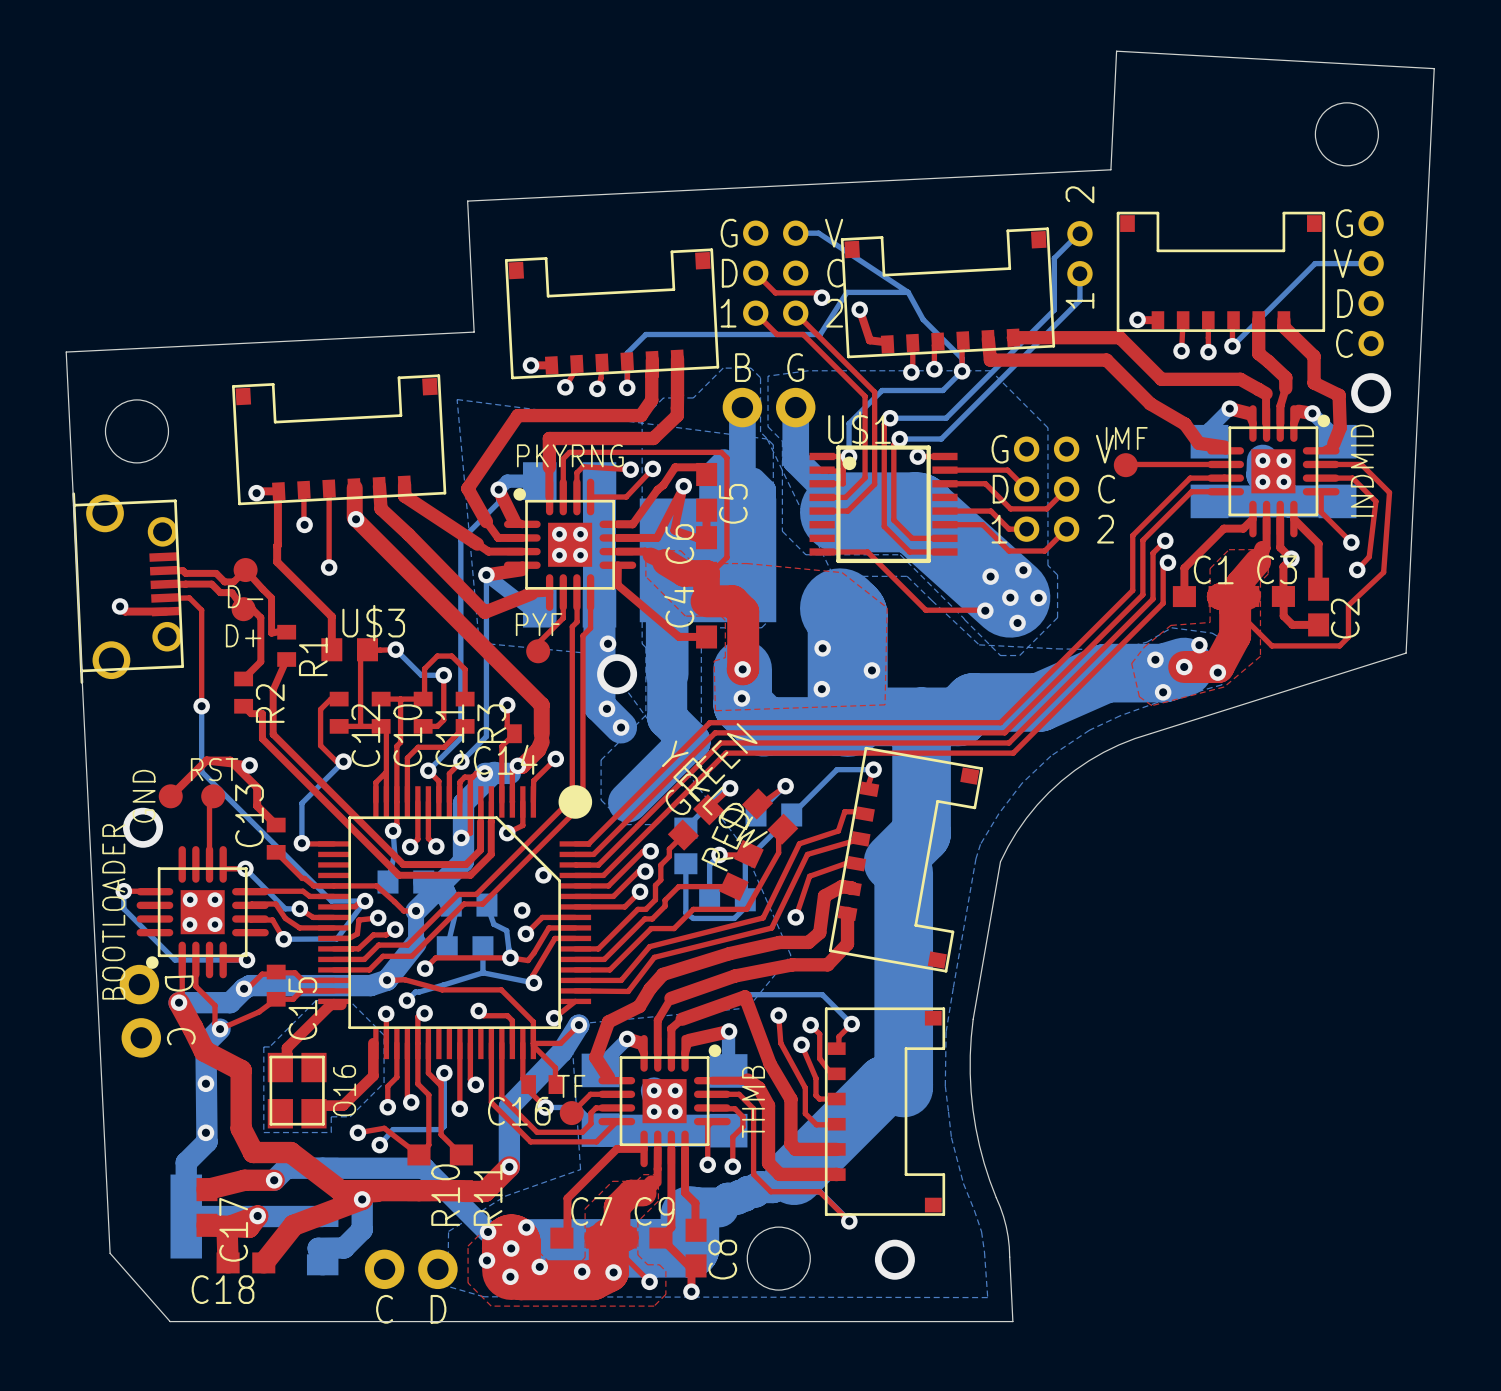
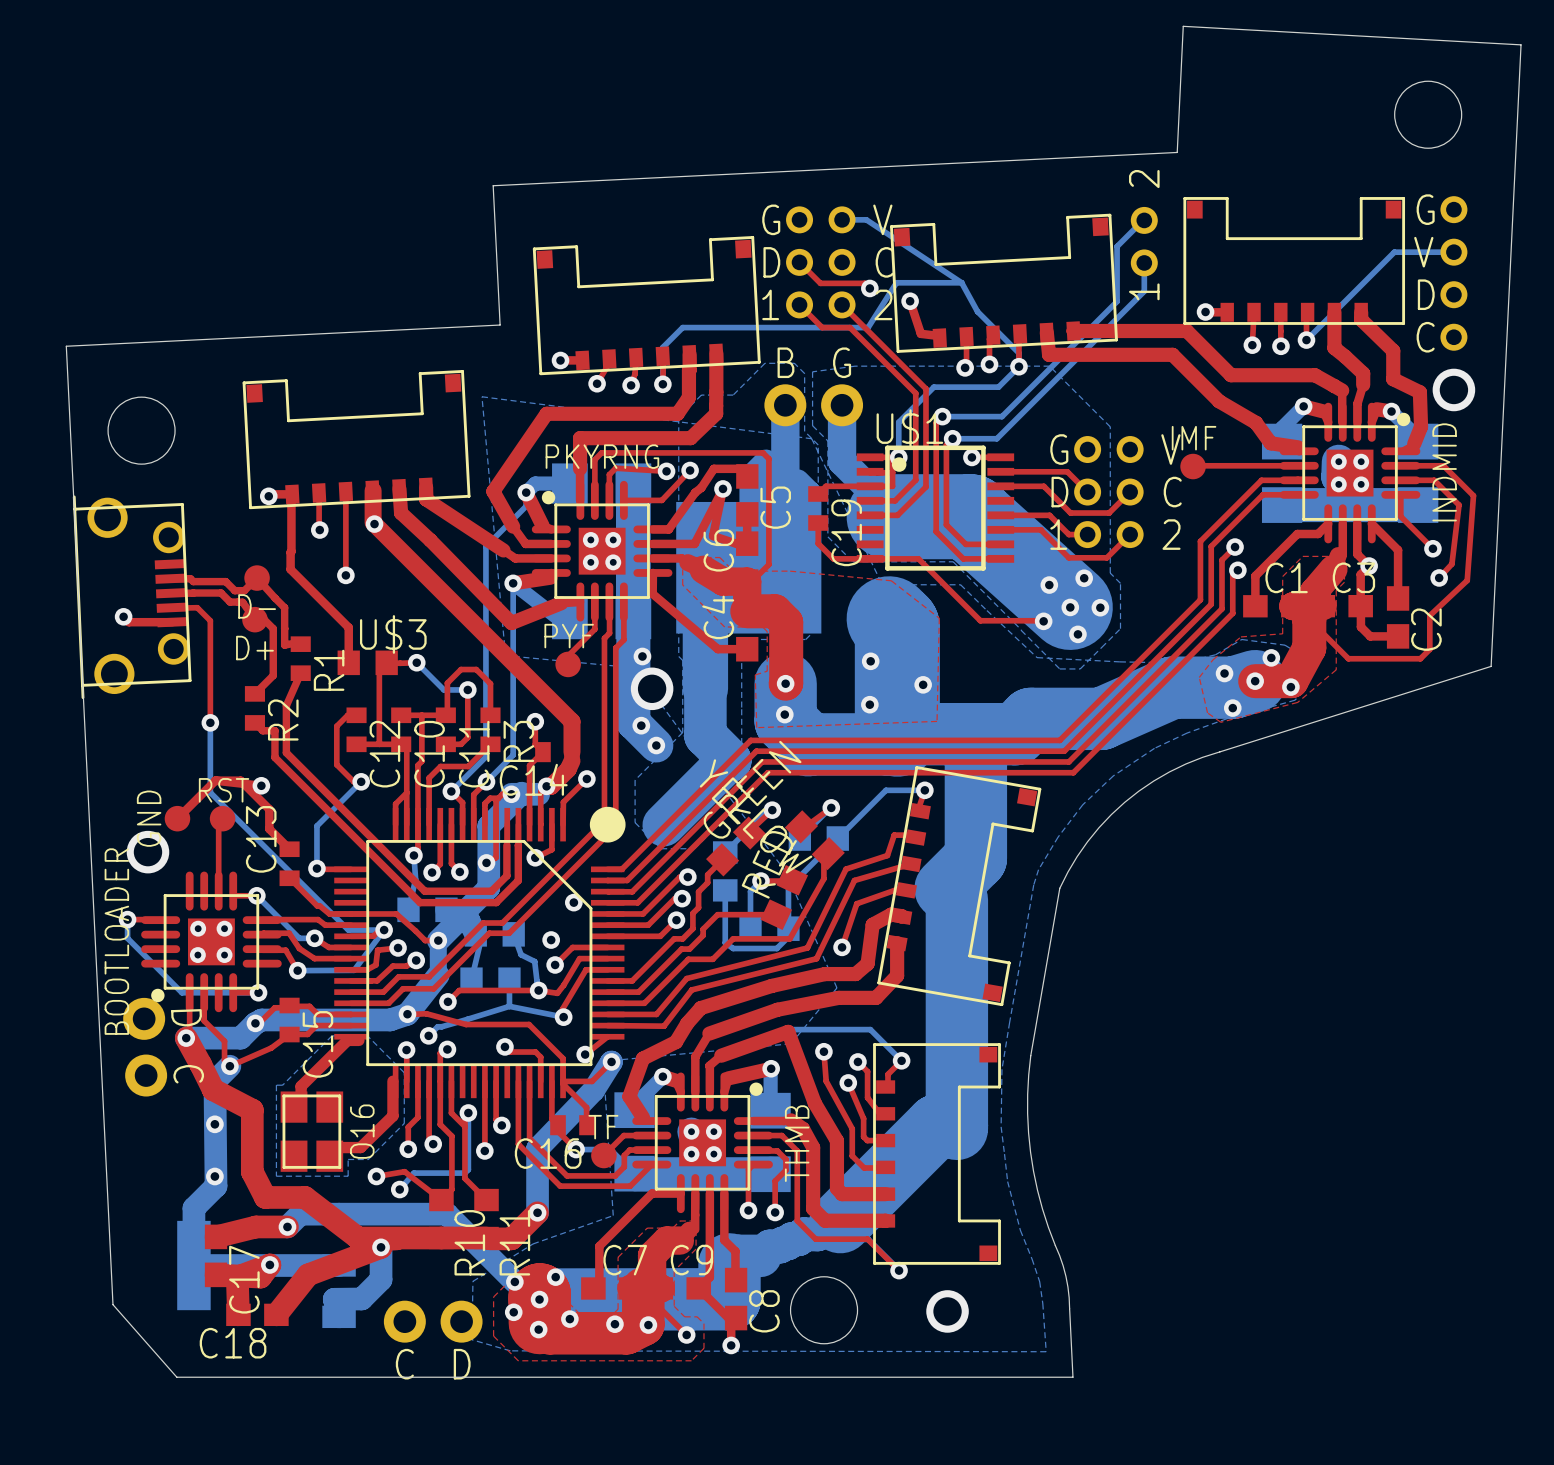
top track: none -> (870, 486) (825, 486) (818, 493)
C19: none -> (818, 508)
top track: none -> (818, 523) (818, 543) (833, 558) (870, 558)

